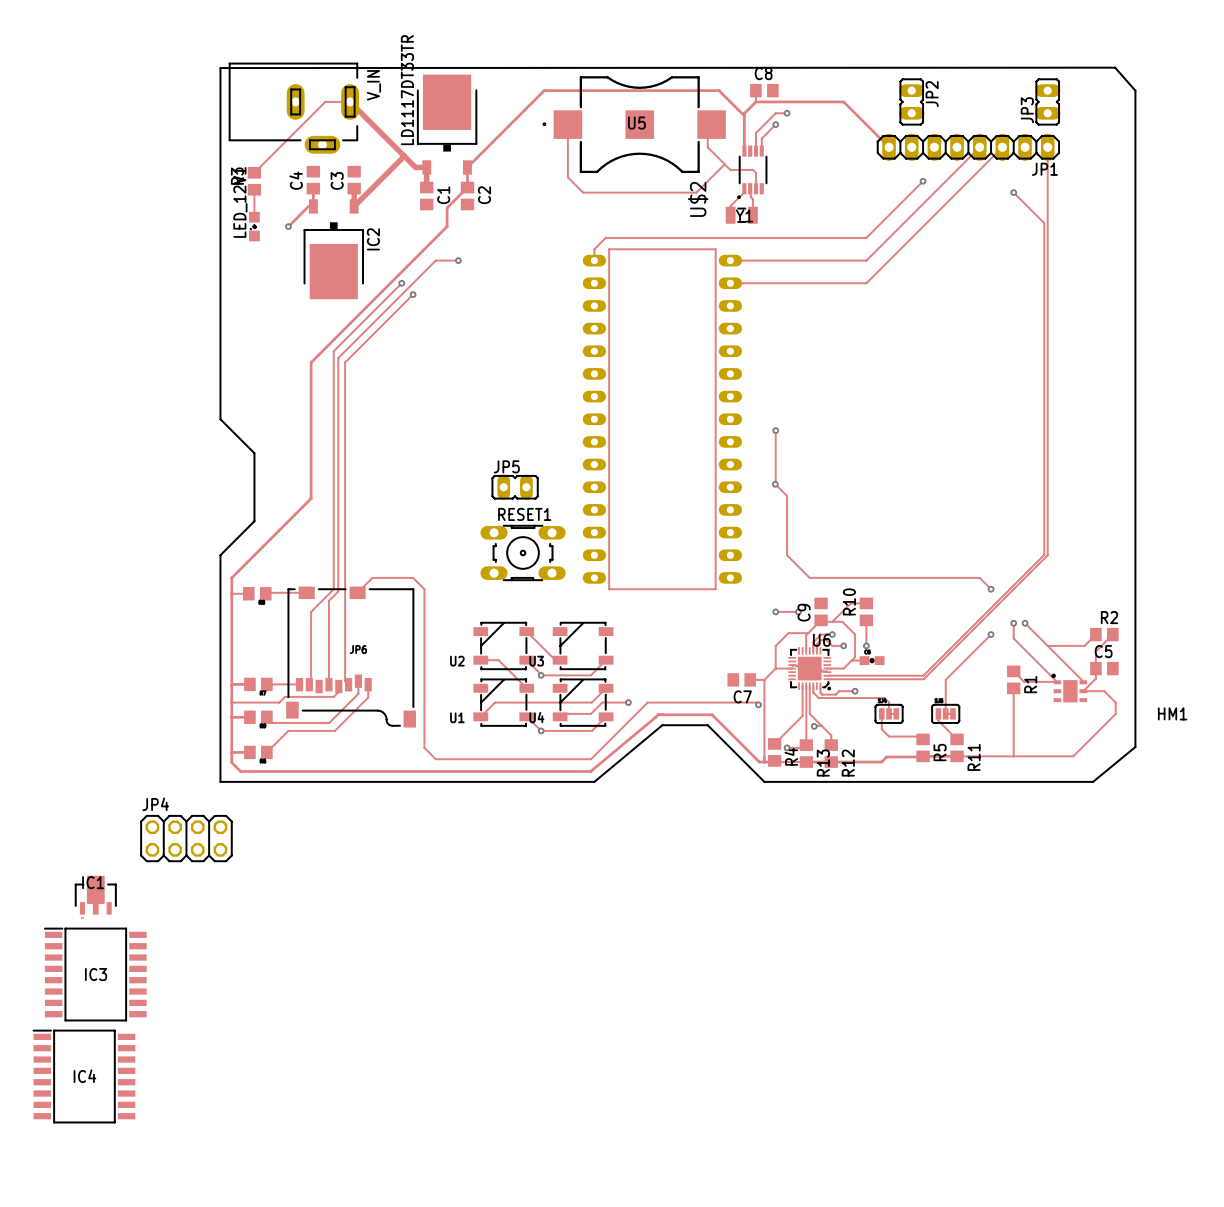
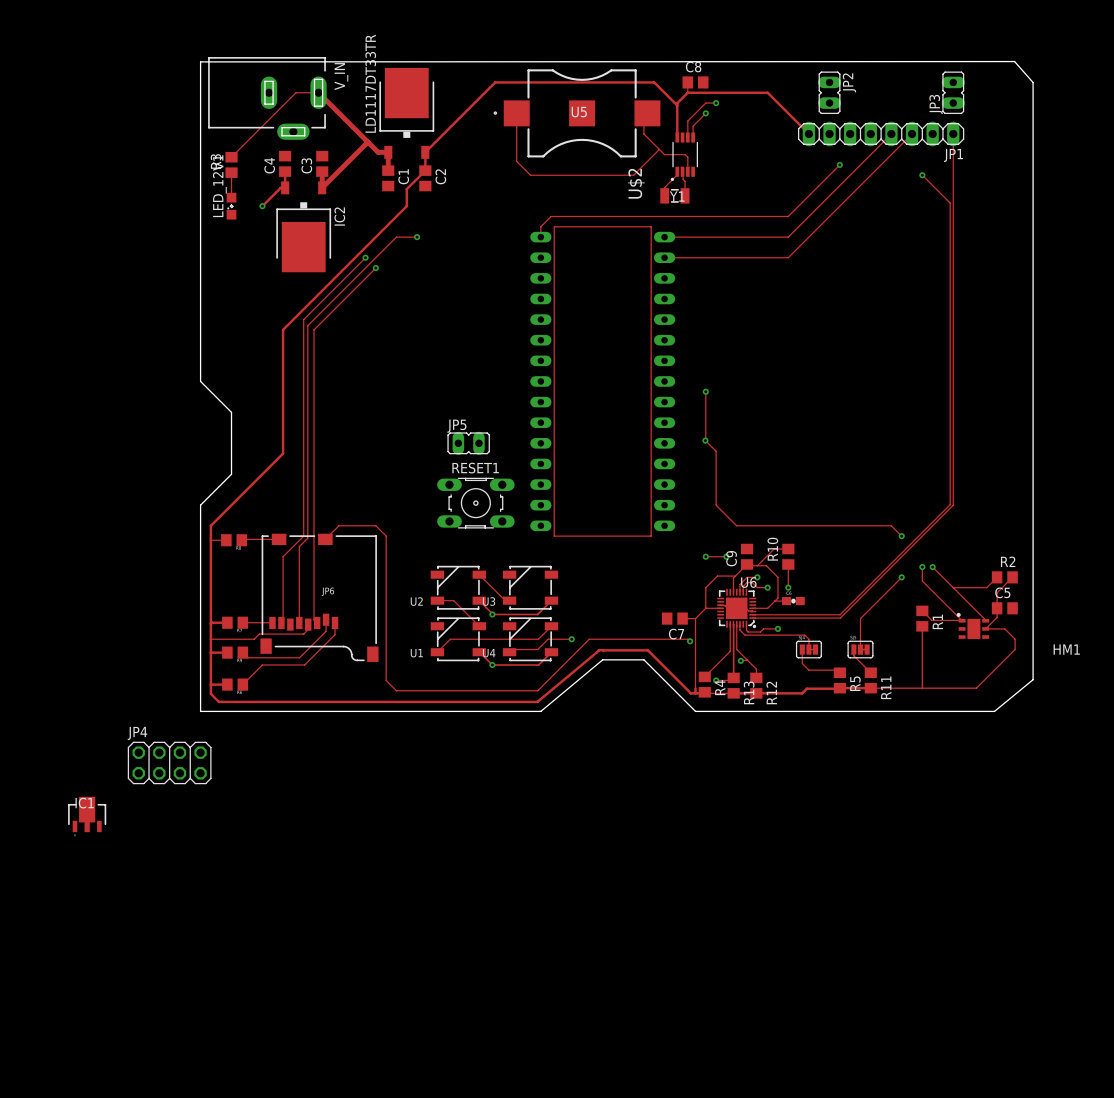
IC3: (95, 974) -> none
IC4: (84, 1076) -> none

